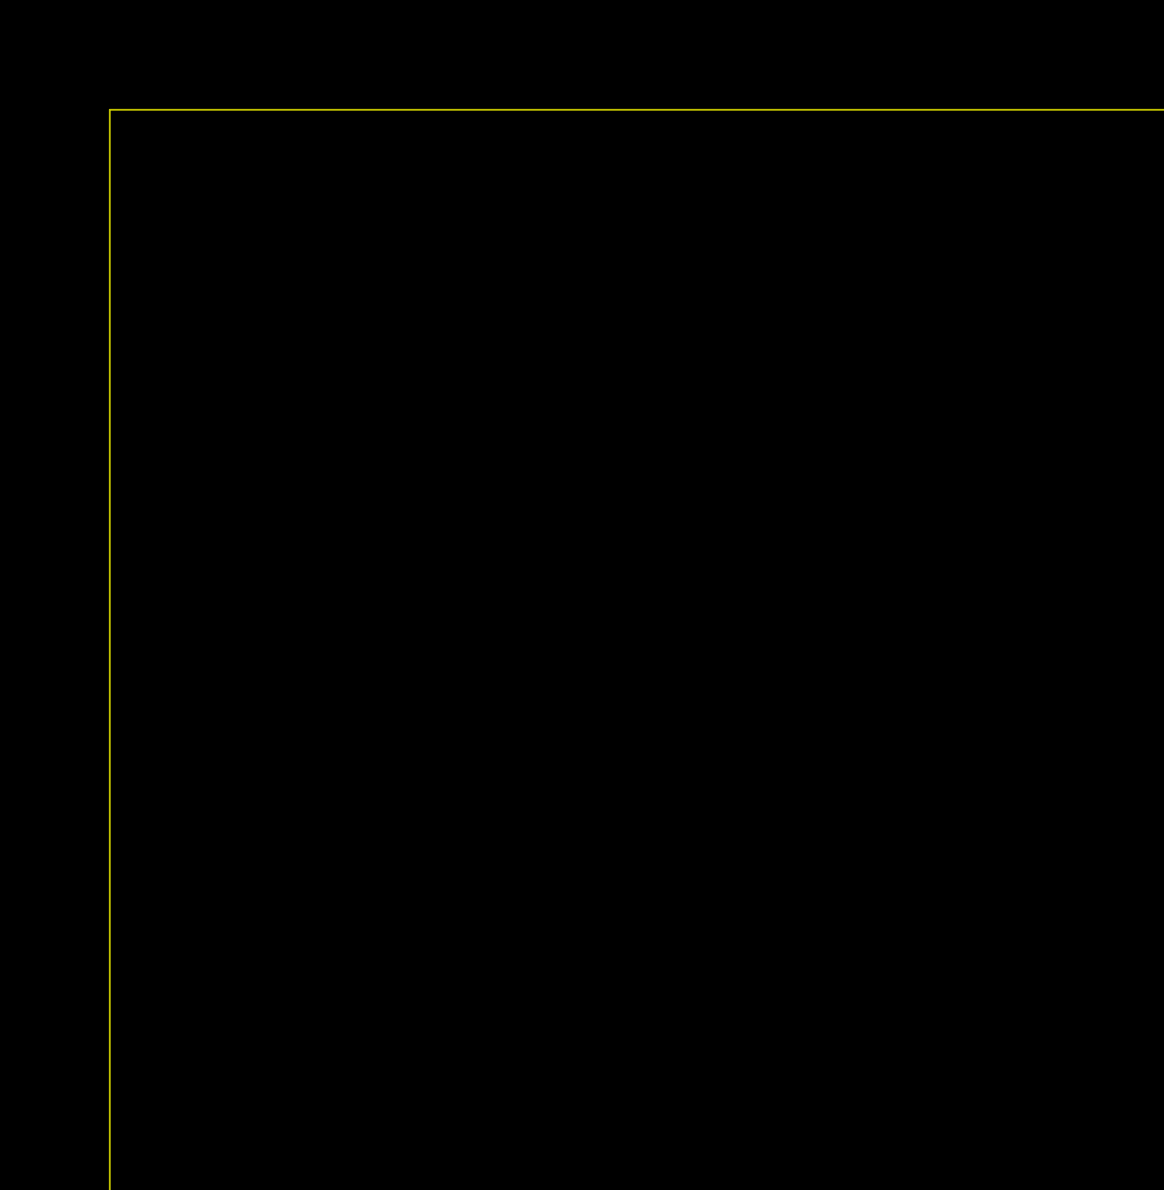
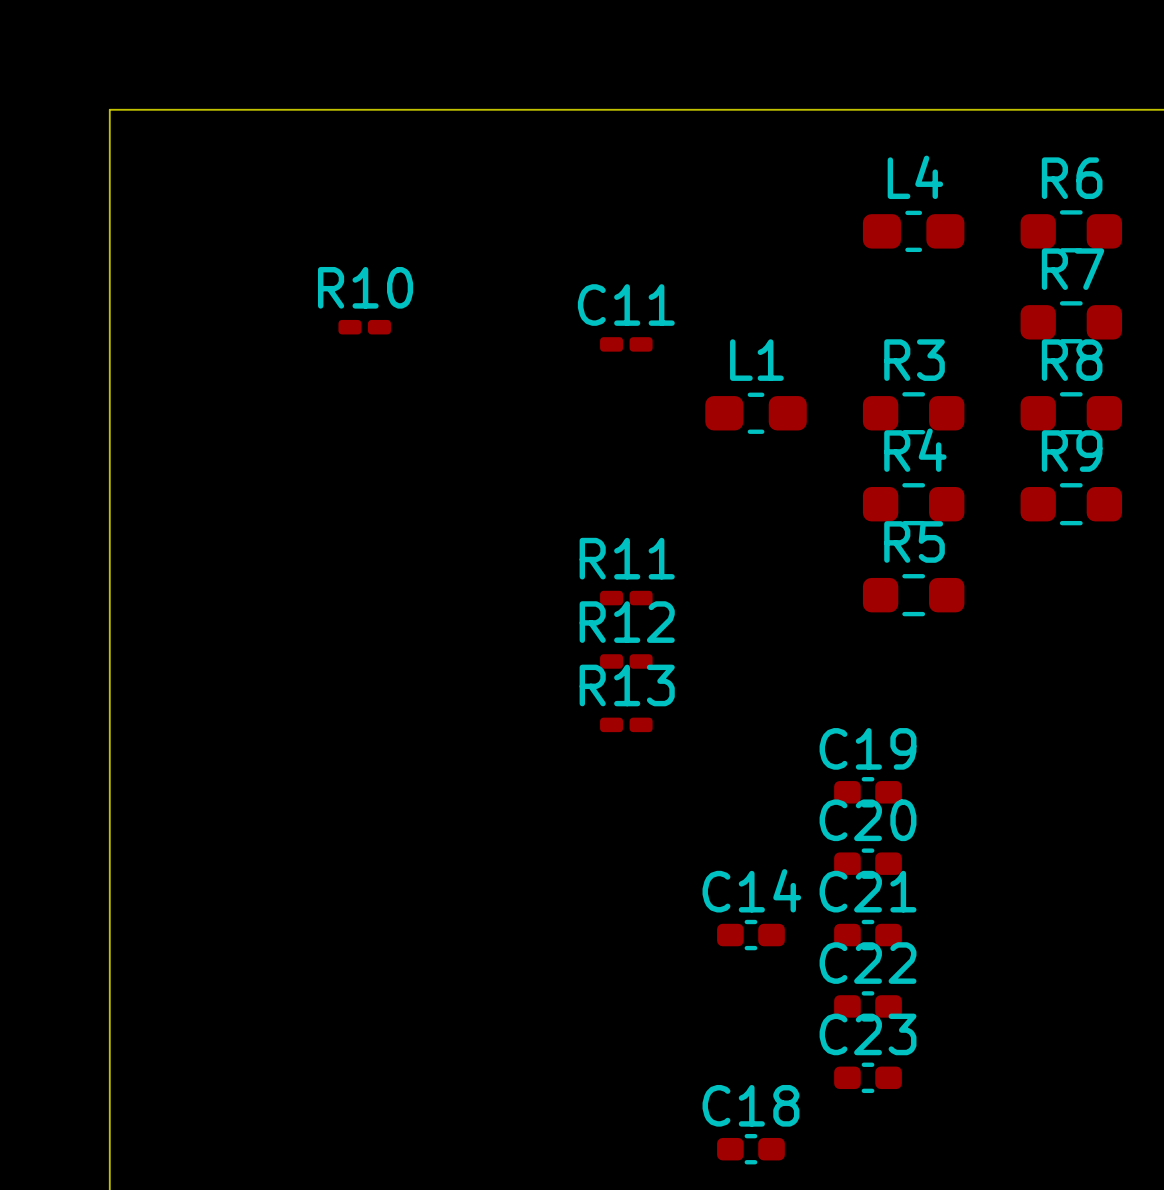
L4: none -> (913, 231)
R6: none -> (1071, 231)
R7: none -> (1071, 322)
R10: none -> (364, 327)
C11: none -> (626, 344)
L1: none -> (756, 413)
R3: none -> (913, 413)
R8: none -> (1071, 413)
R4: none -> (913, 504)
R9: none -> (1071, 504)
R5: none -> (913, 595)
R11: none -> (626, 598)
R12: none -> (626, 661)
R13: none -> (626, 724)
C19: none -> (868, 792)
C20: none -> (868, 863)
C14: none -> (750, 935)
C21: none -> (868, 935)
C22: none -> (868, 1006)
C23: none -> (868, 1077)
C18: none -> (750, 1149)

